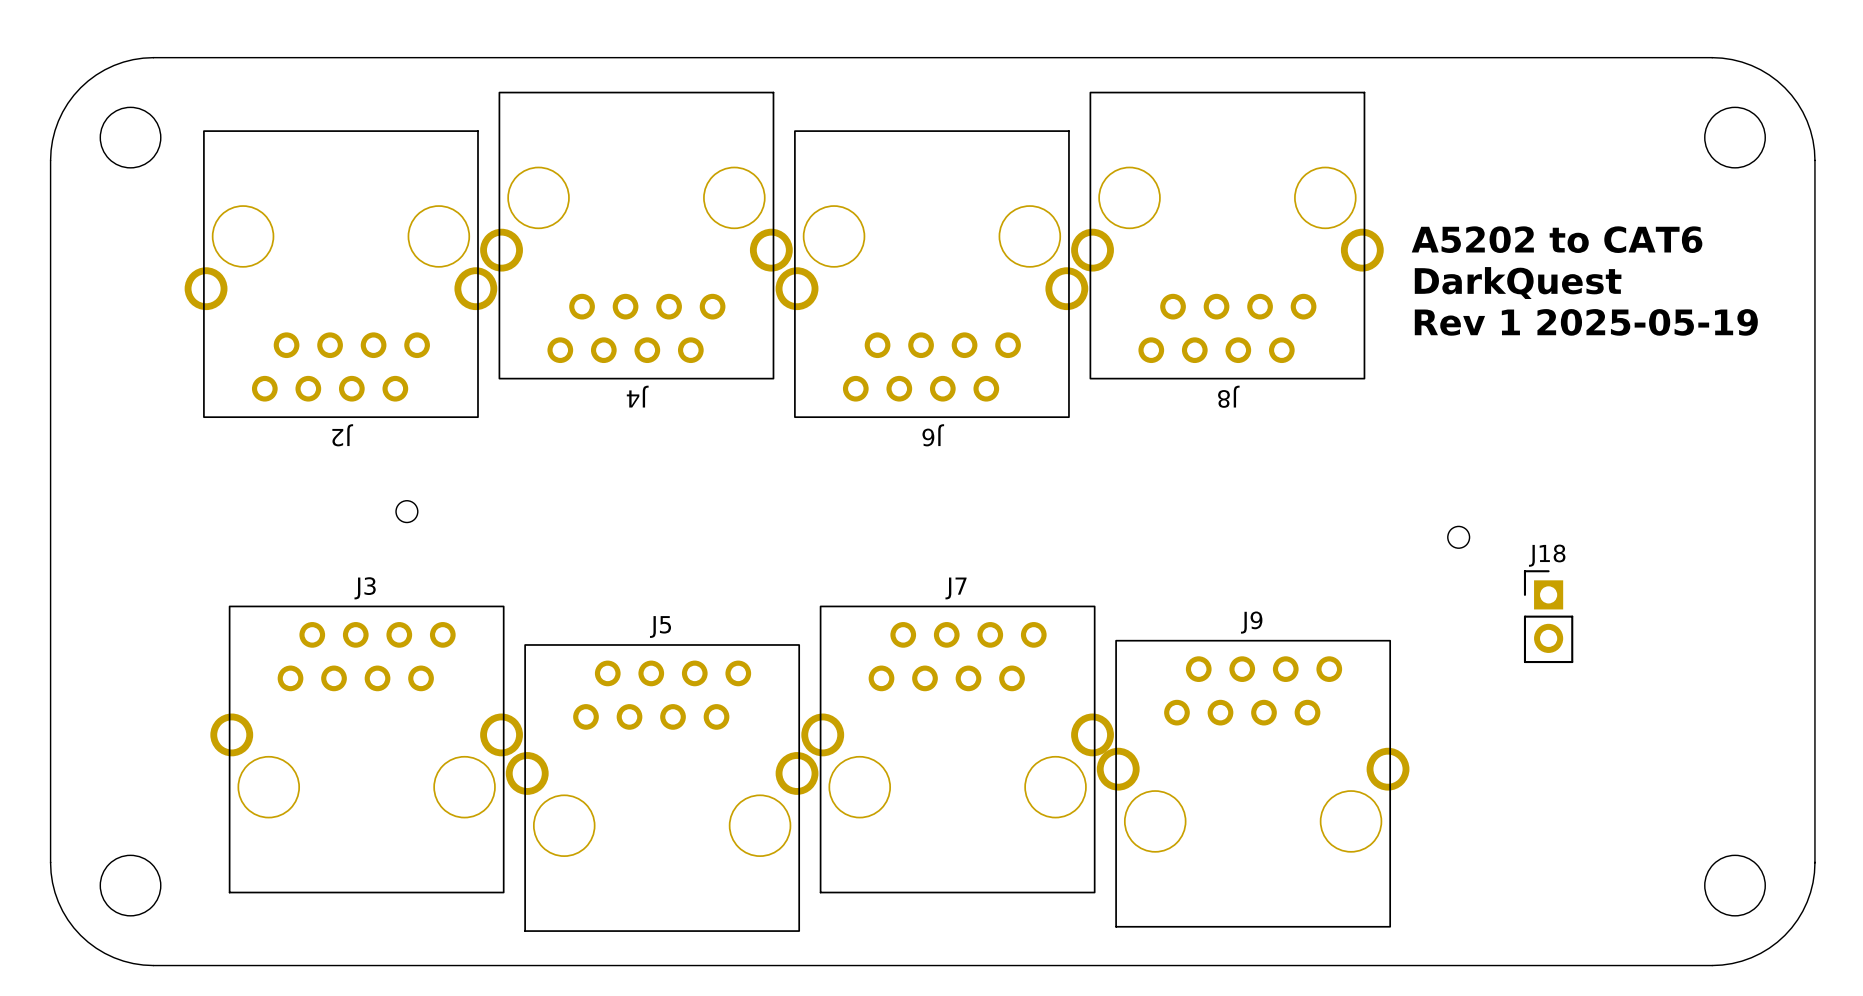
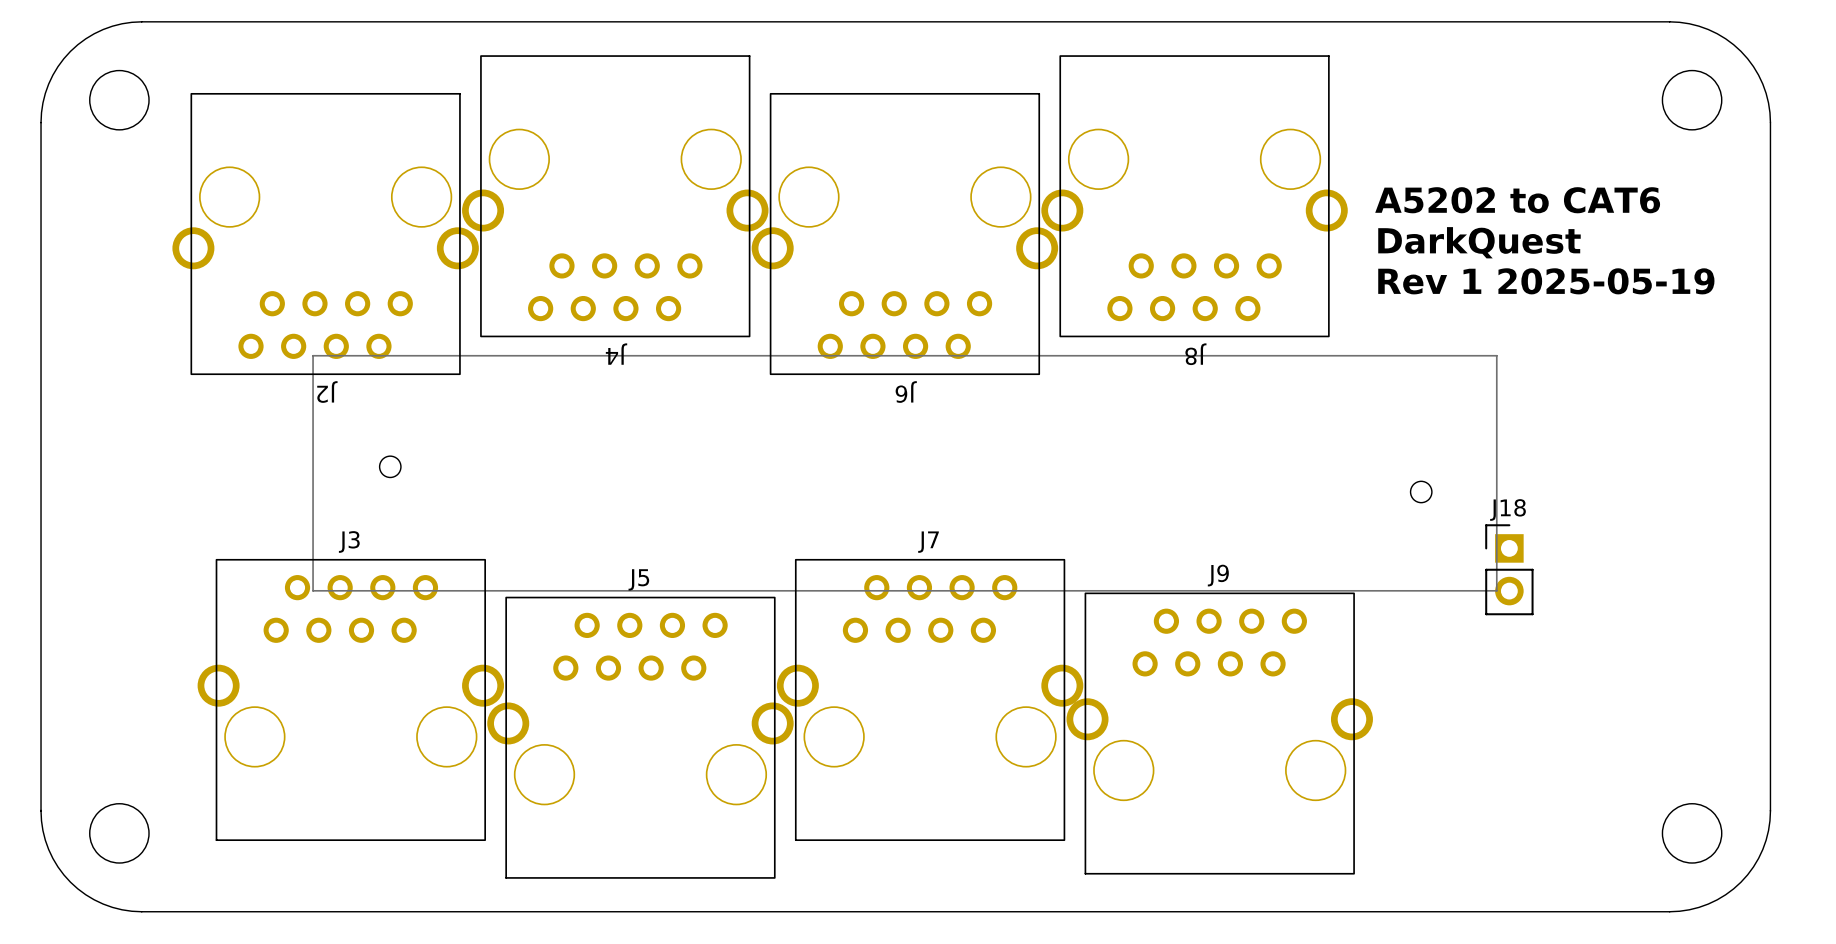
line: none -> (313, 355) (1496, 355) (1496, 590) (313, 590) (313, 355)

